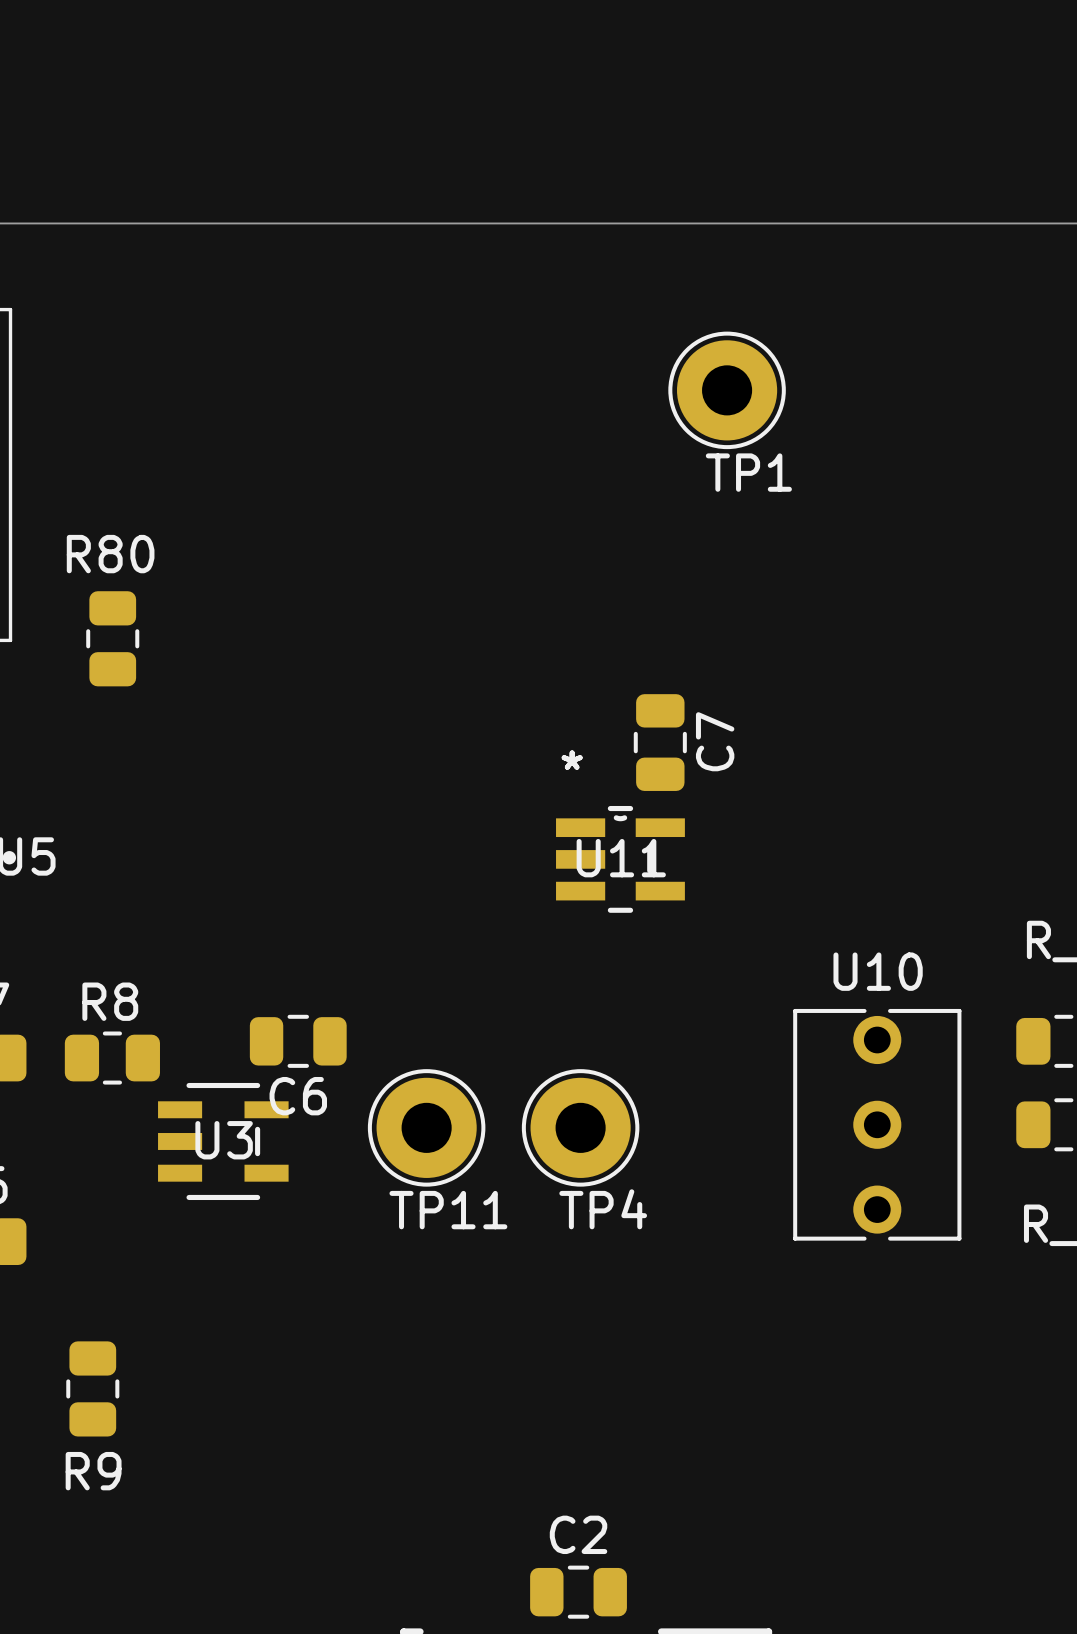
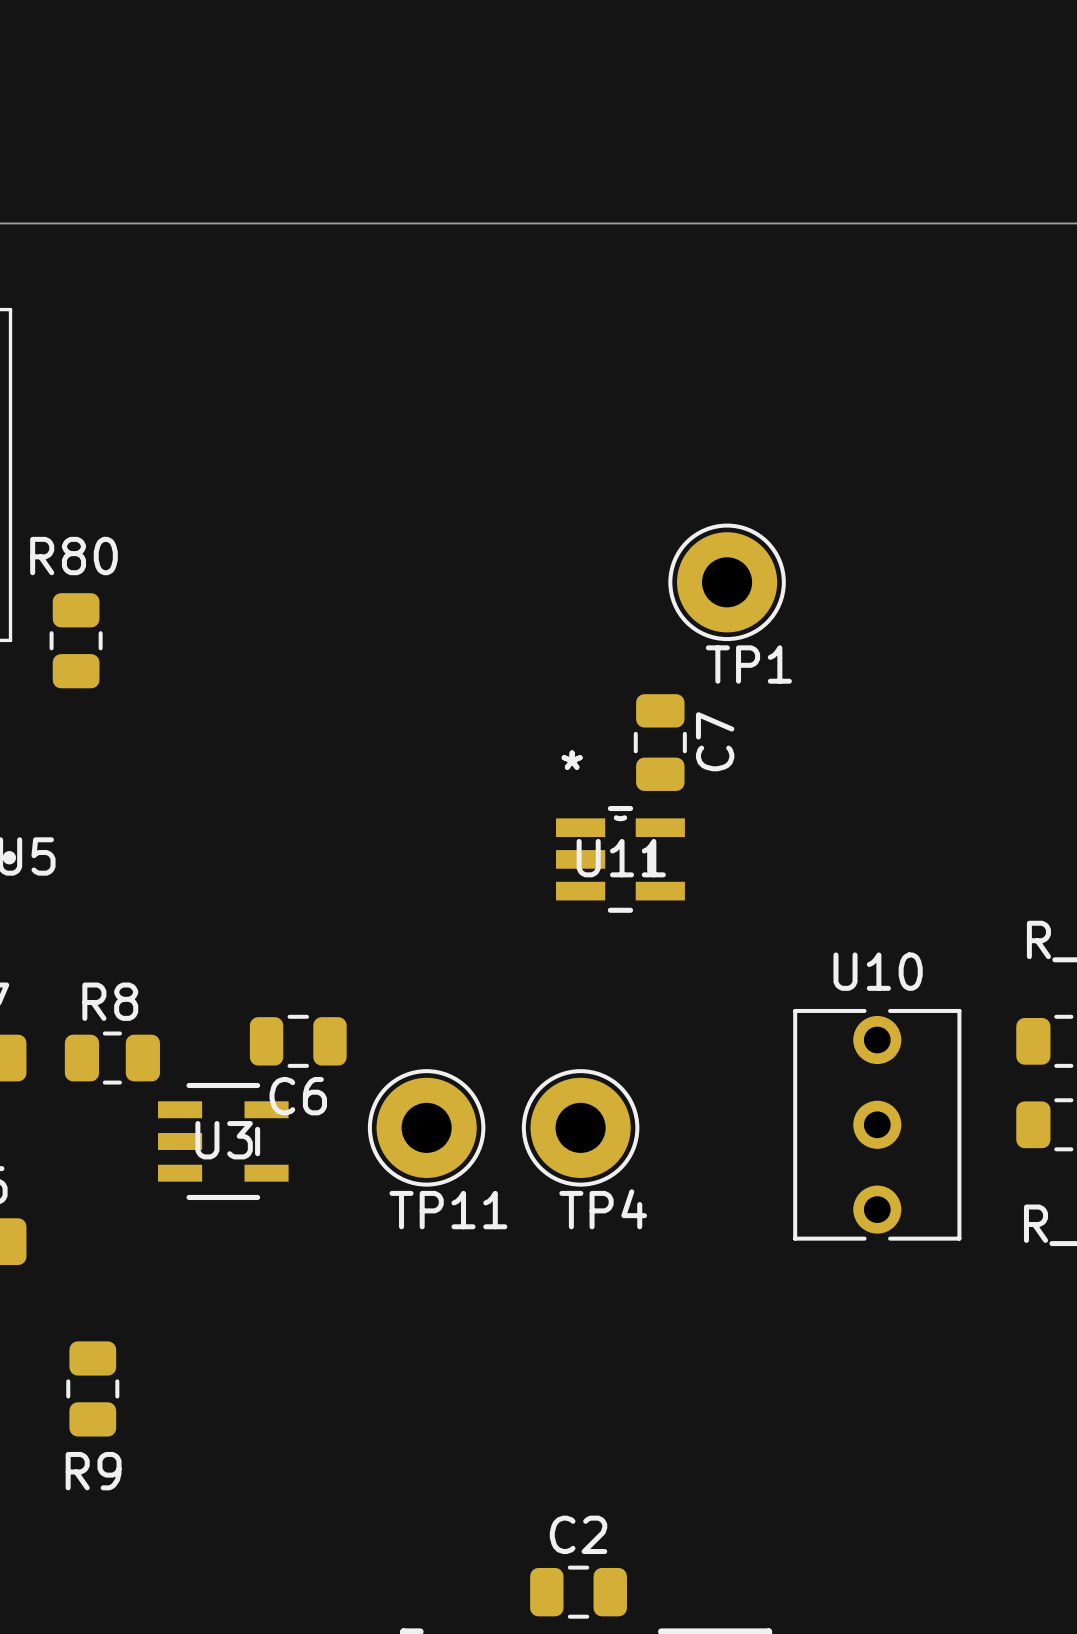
TP1 position: (727, 390) -> (727, 582)
R80 position: (112, 638) -> (76, 640)

